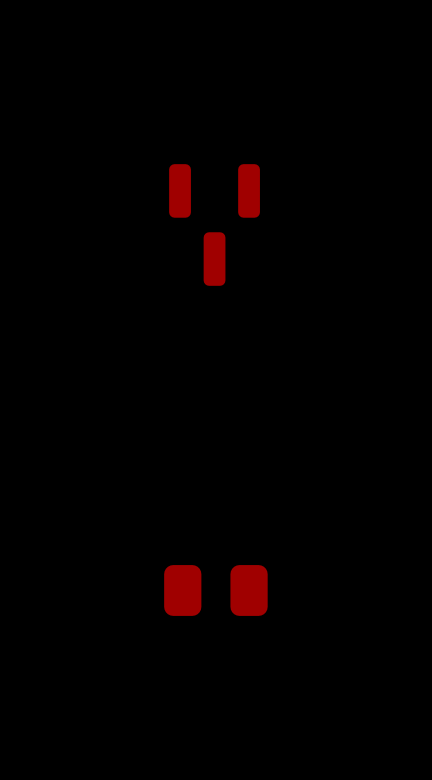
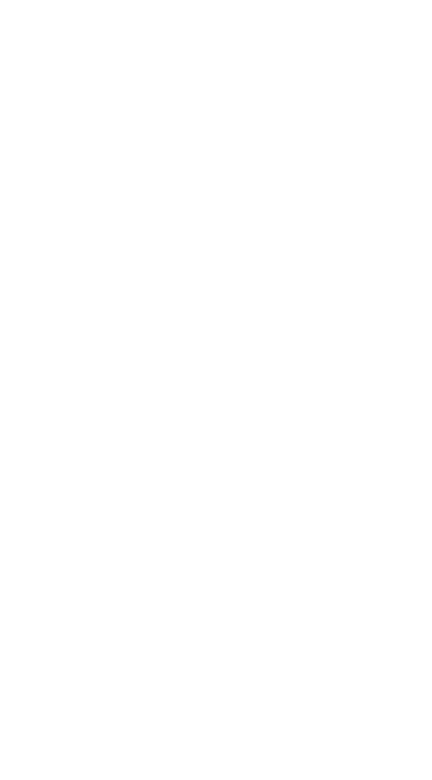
part: (214, 224) -> none
part: (215, 590) -> none

